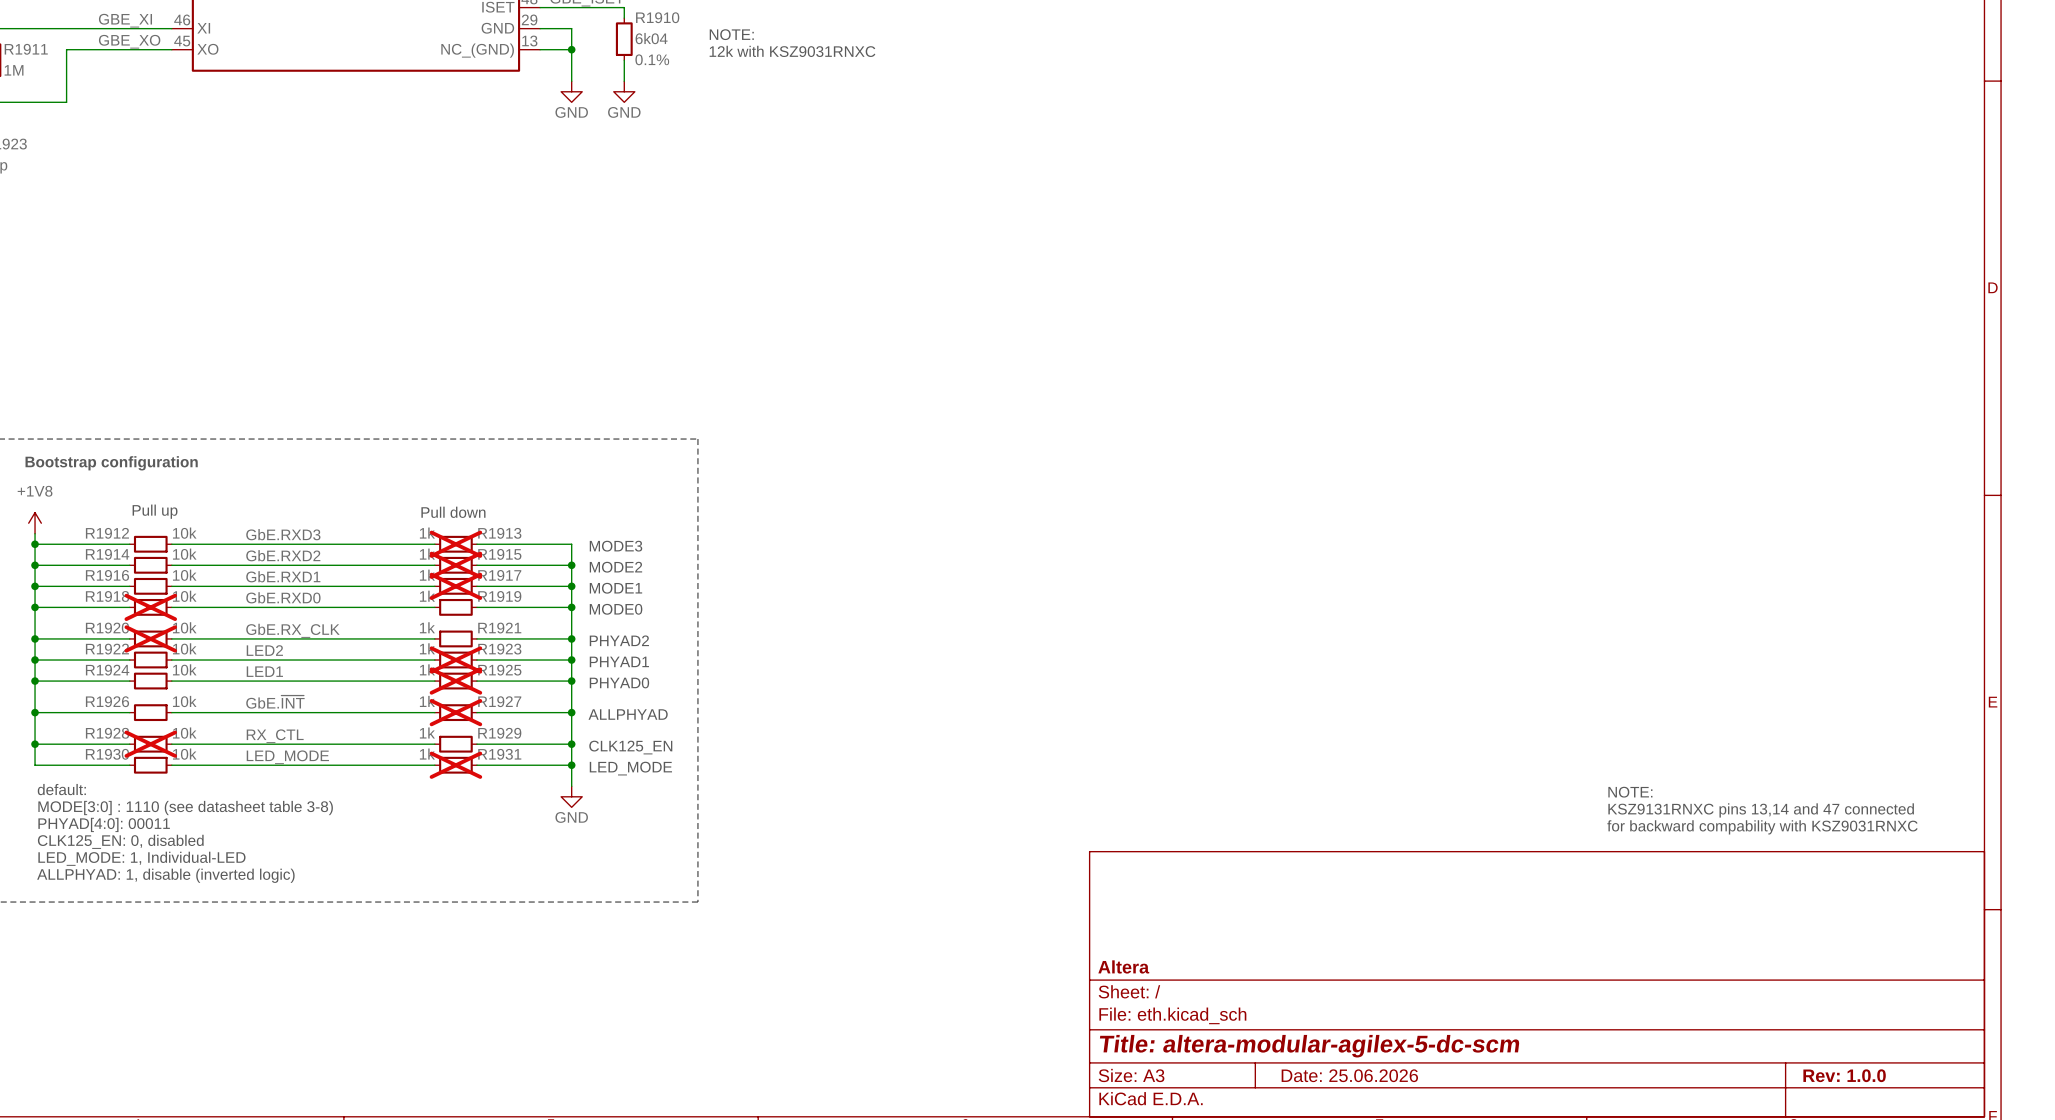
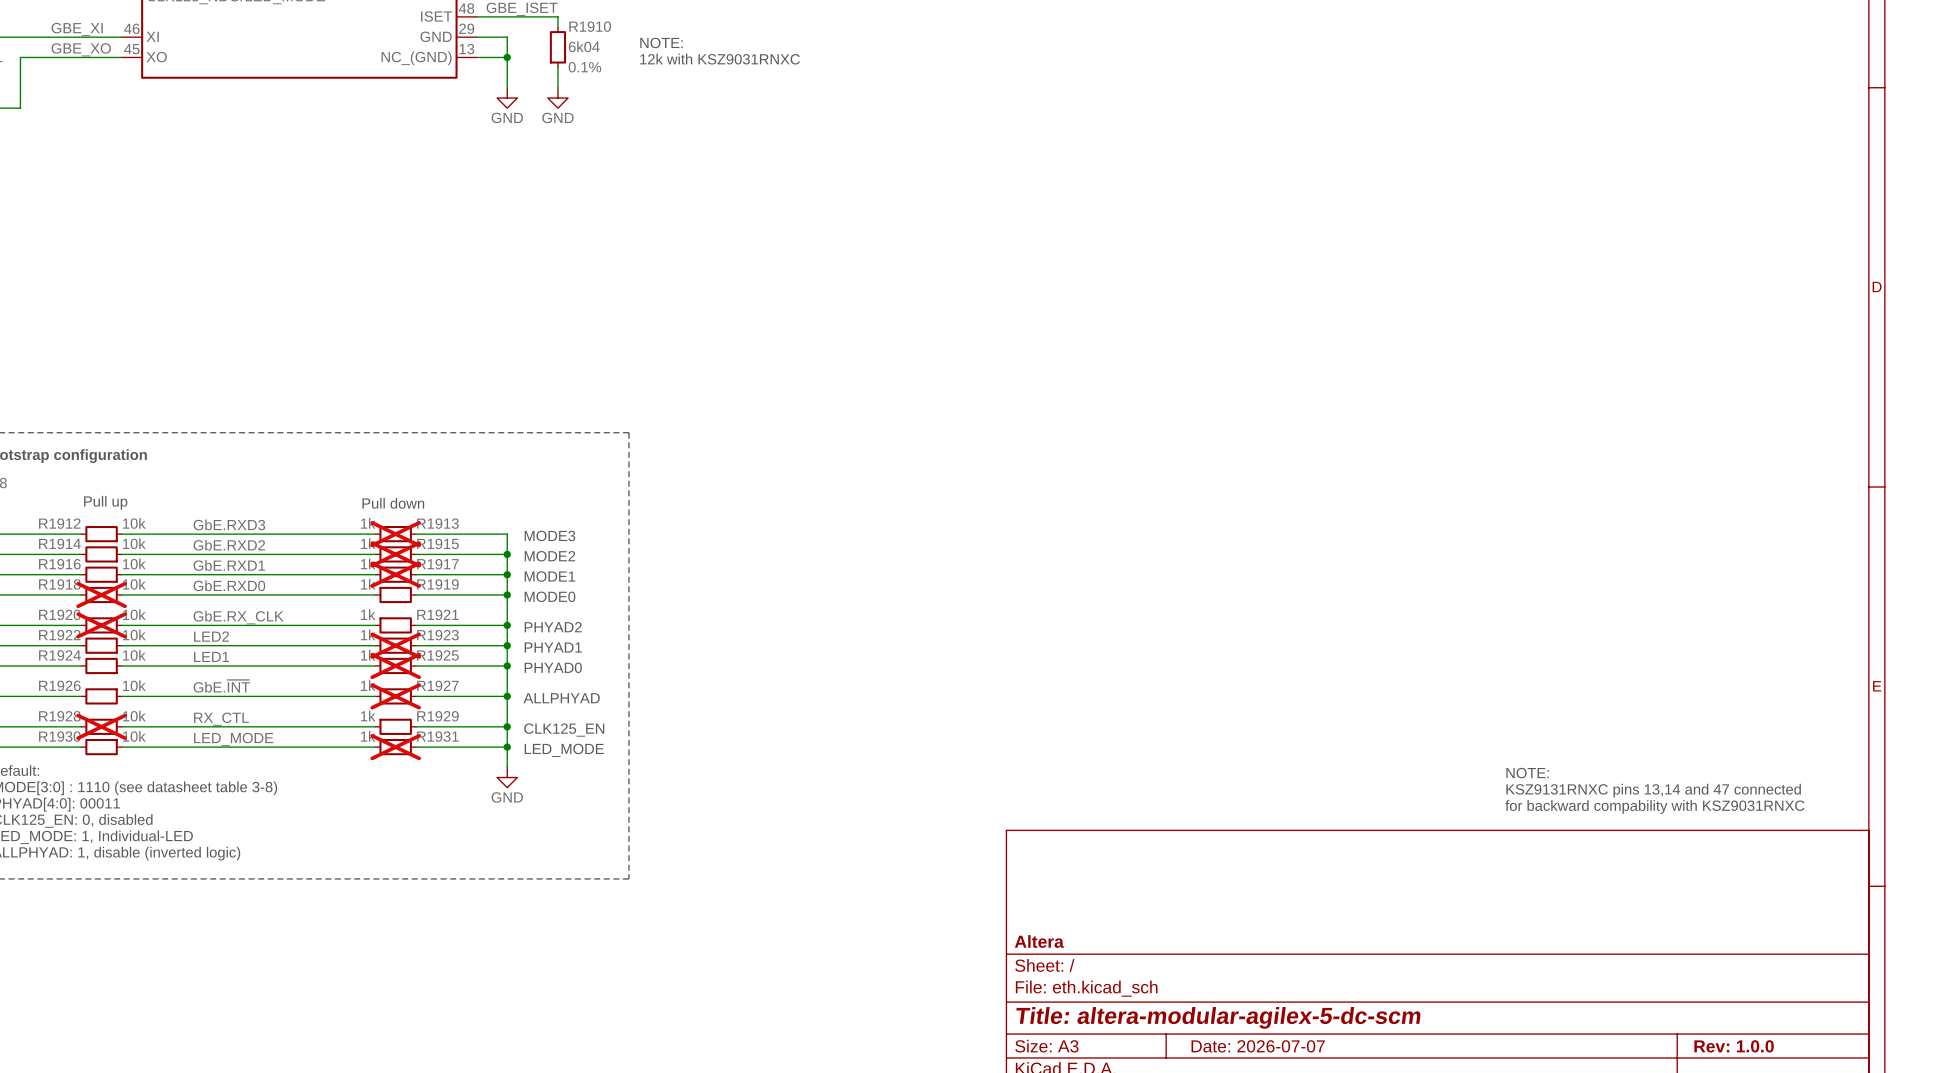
title block: Date: 25.06.2026 (1349, 1075) -> Date: 2026-07-07 (1258, 1046)

